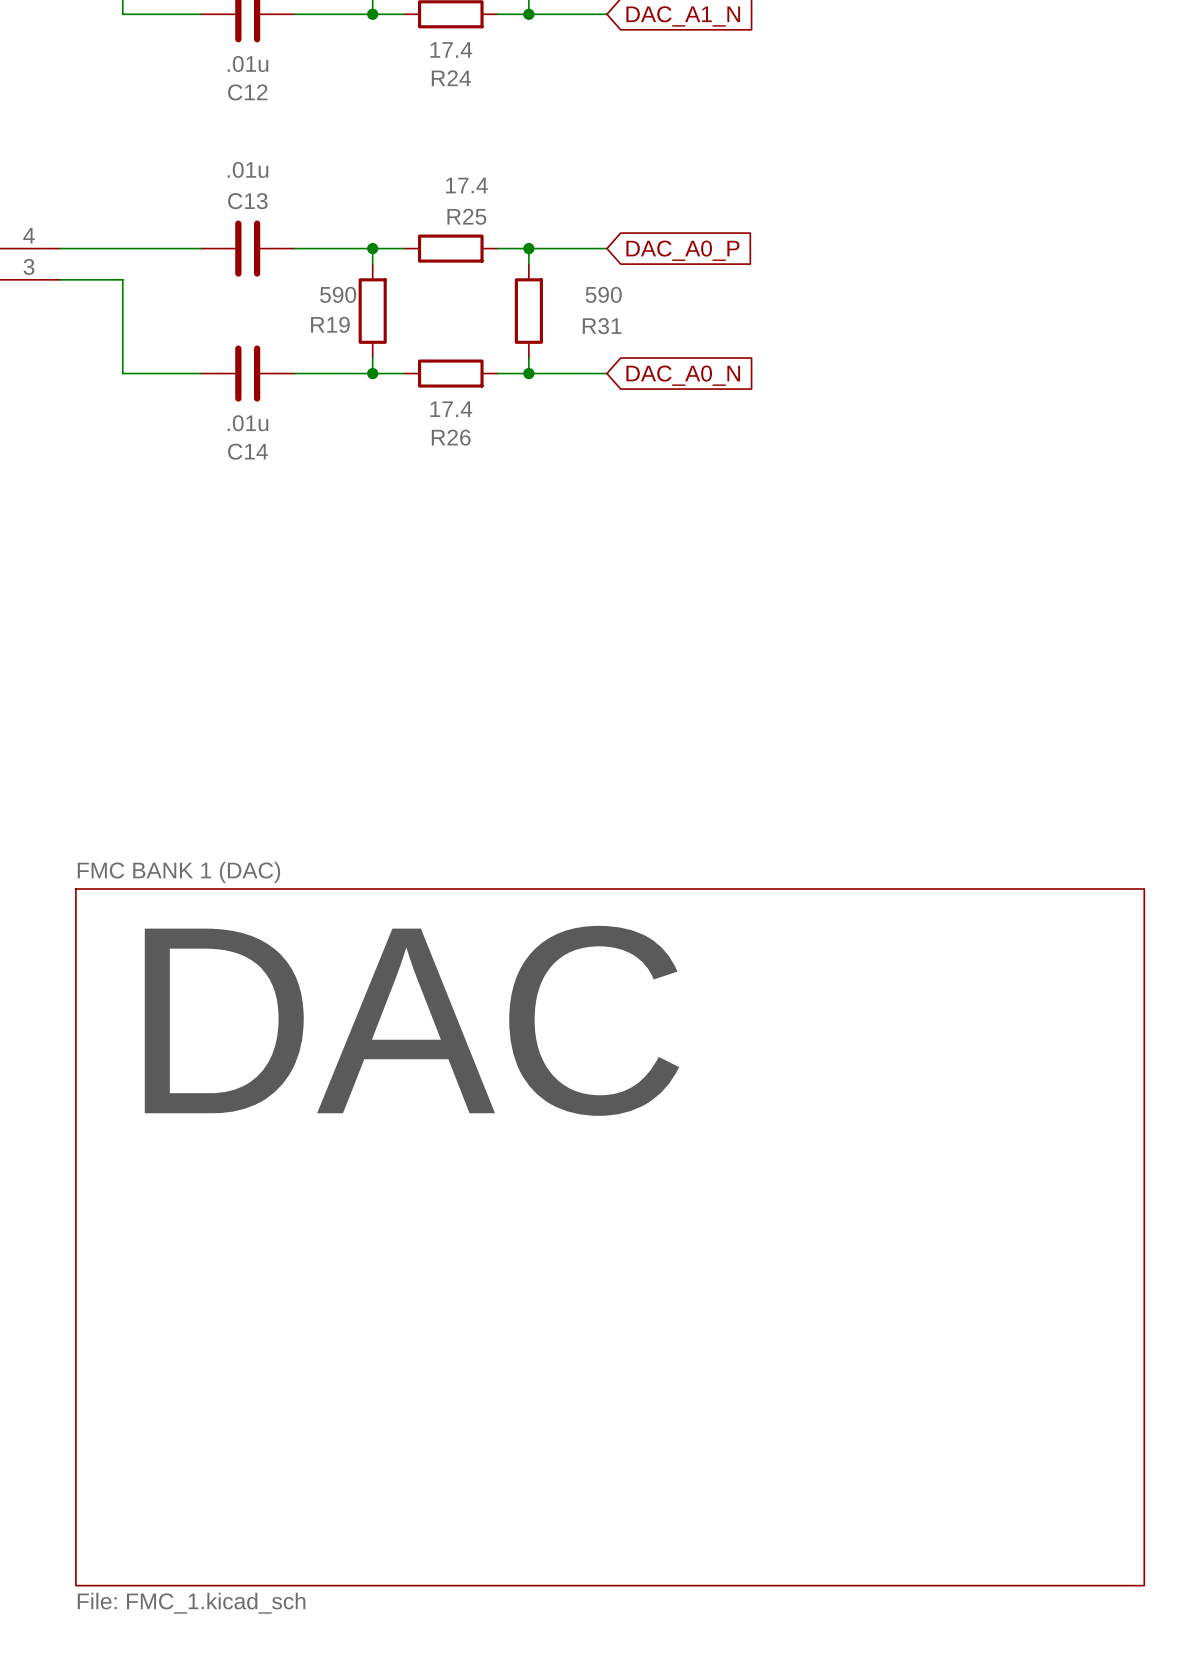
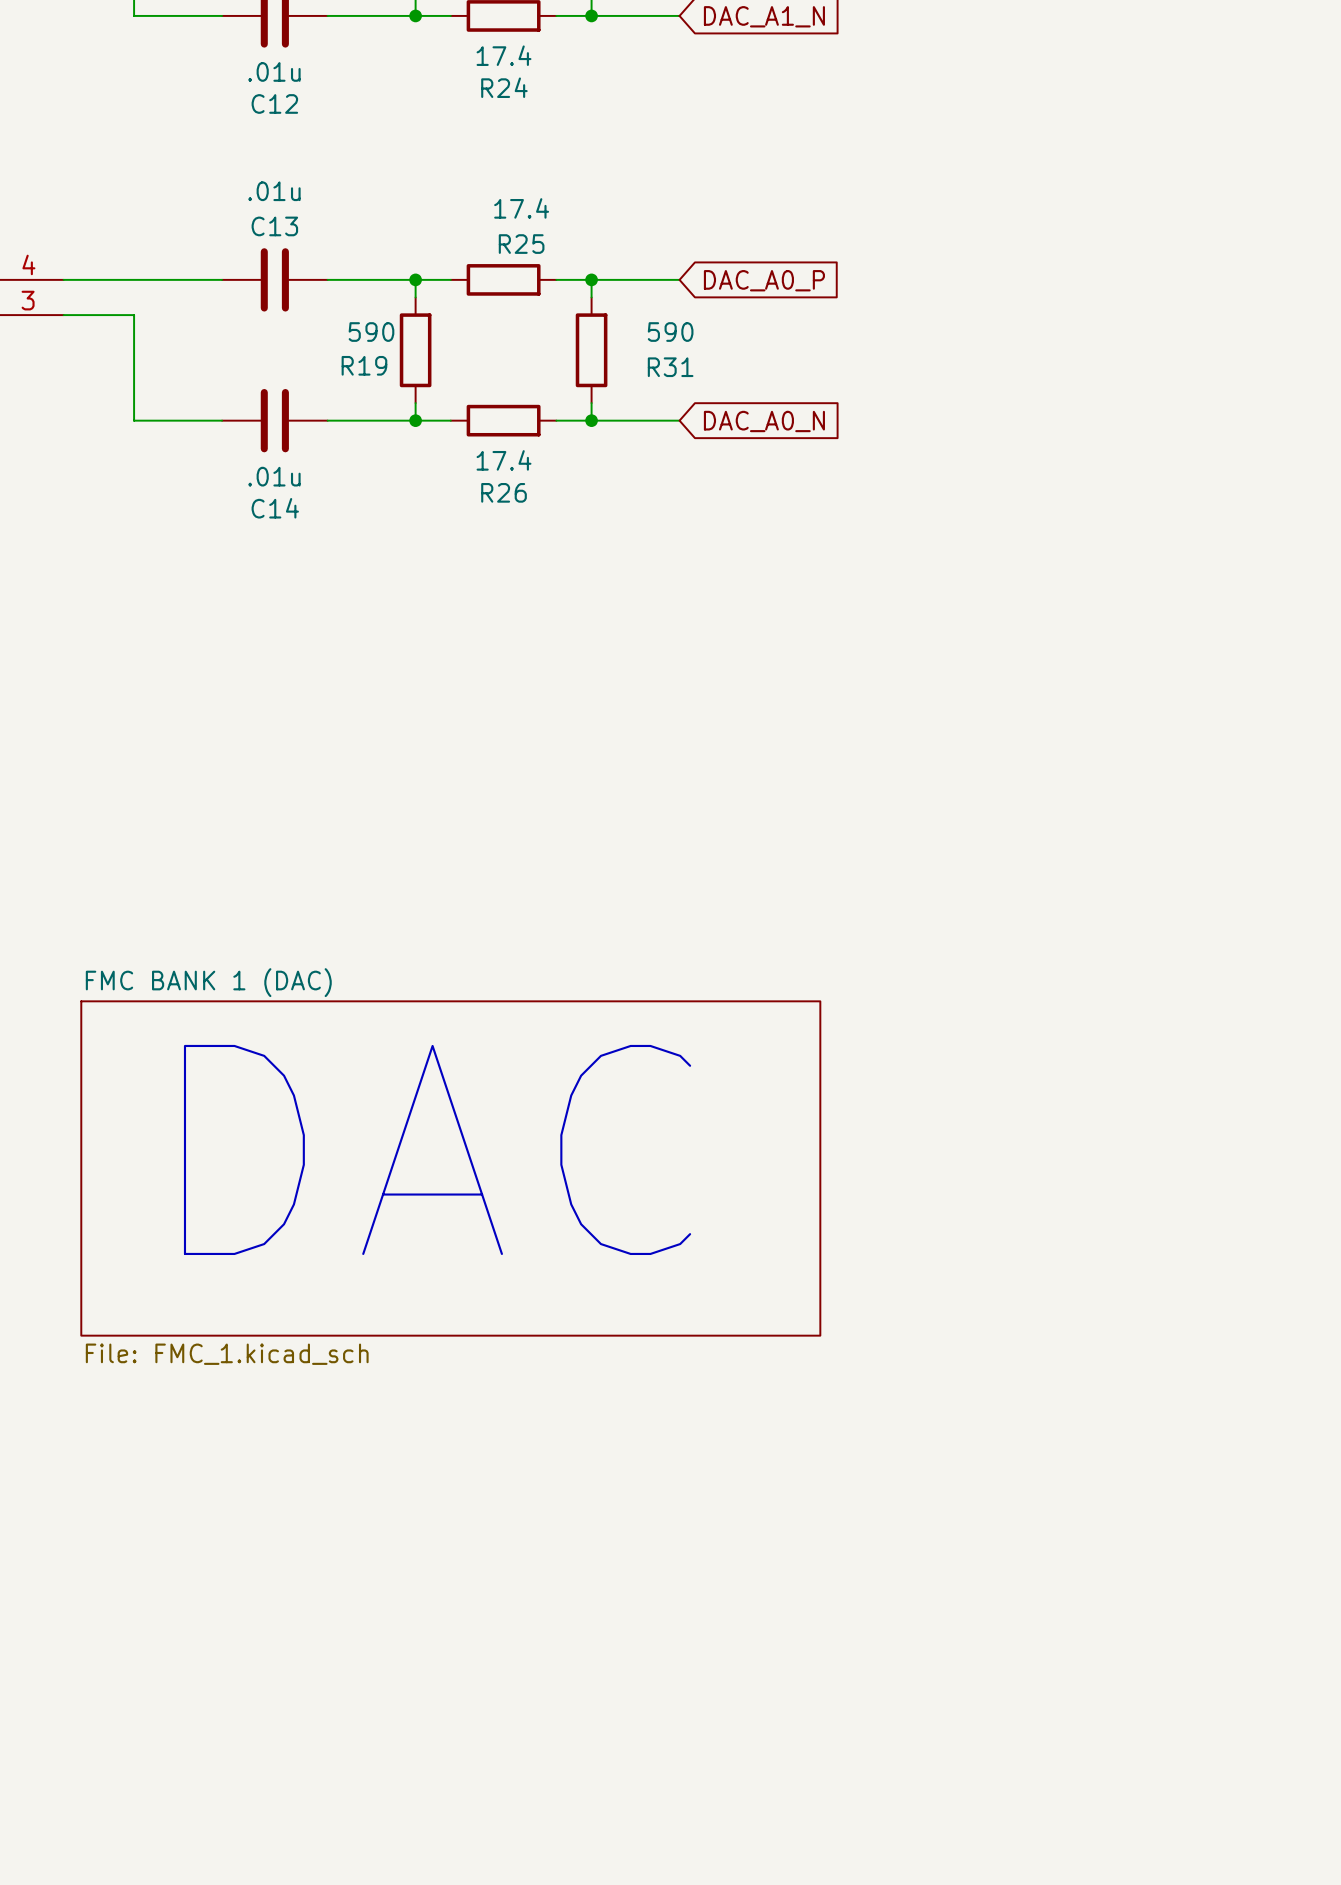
sheet FMC BANK 1 (DAC) shape: [75, 889, 1145, 1586] -> [81, 1001, 821, 1336]
sheet FMC BANK 1 (DAC) value position: File: FMC_1.kicad_sch (191, 1603) -> File: FMC_1.kicad_sch (227, 1354)

